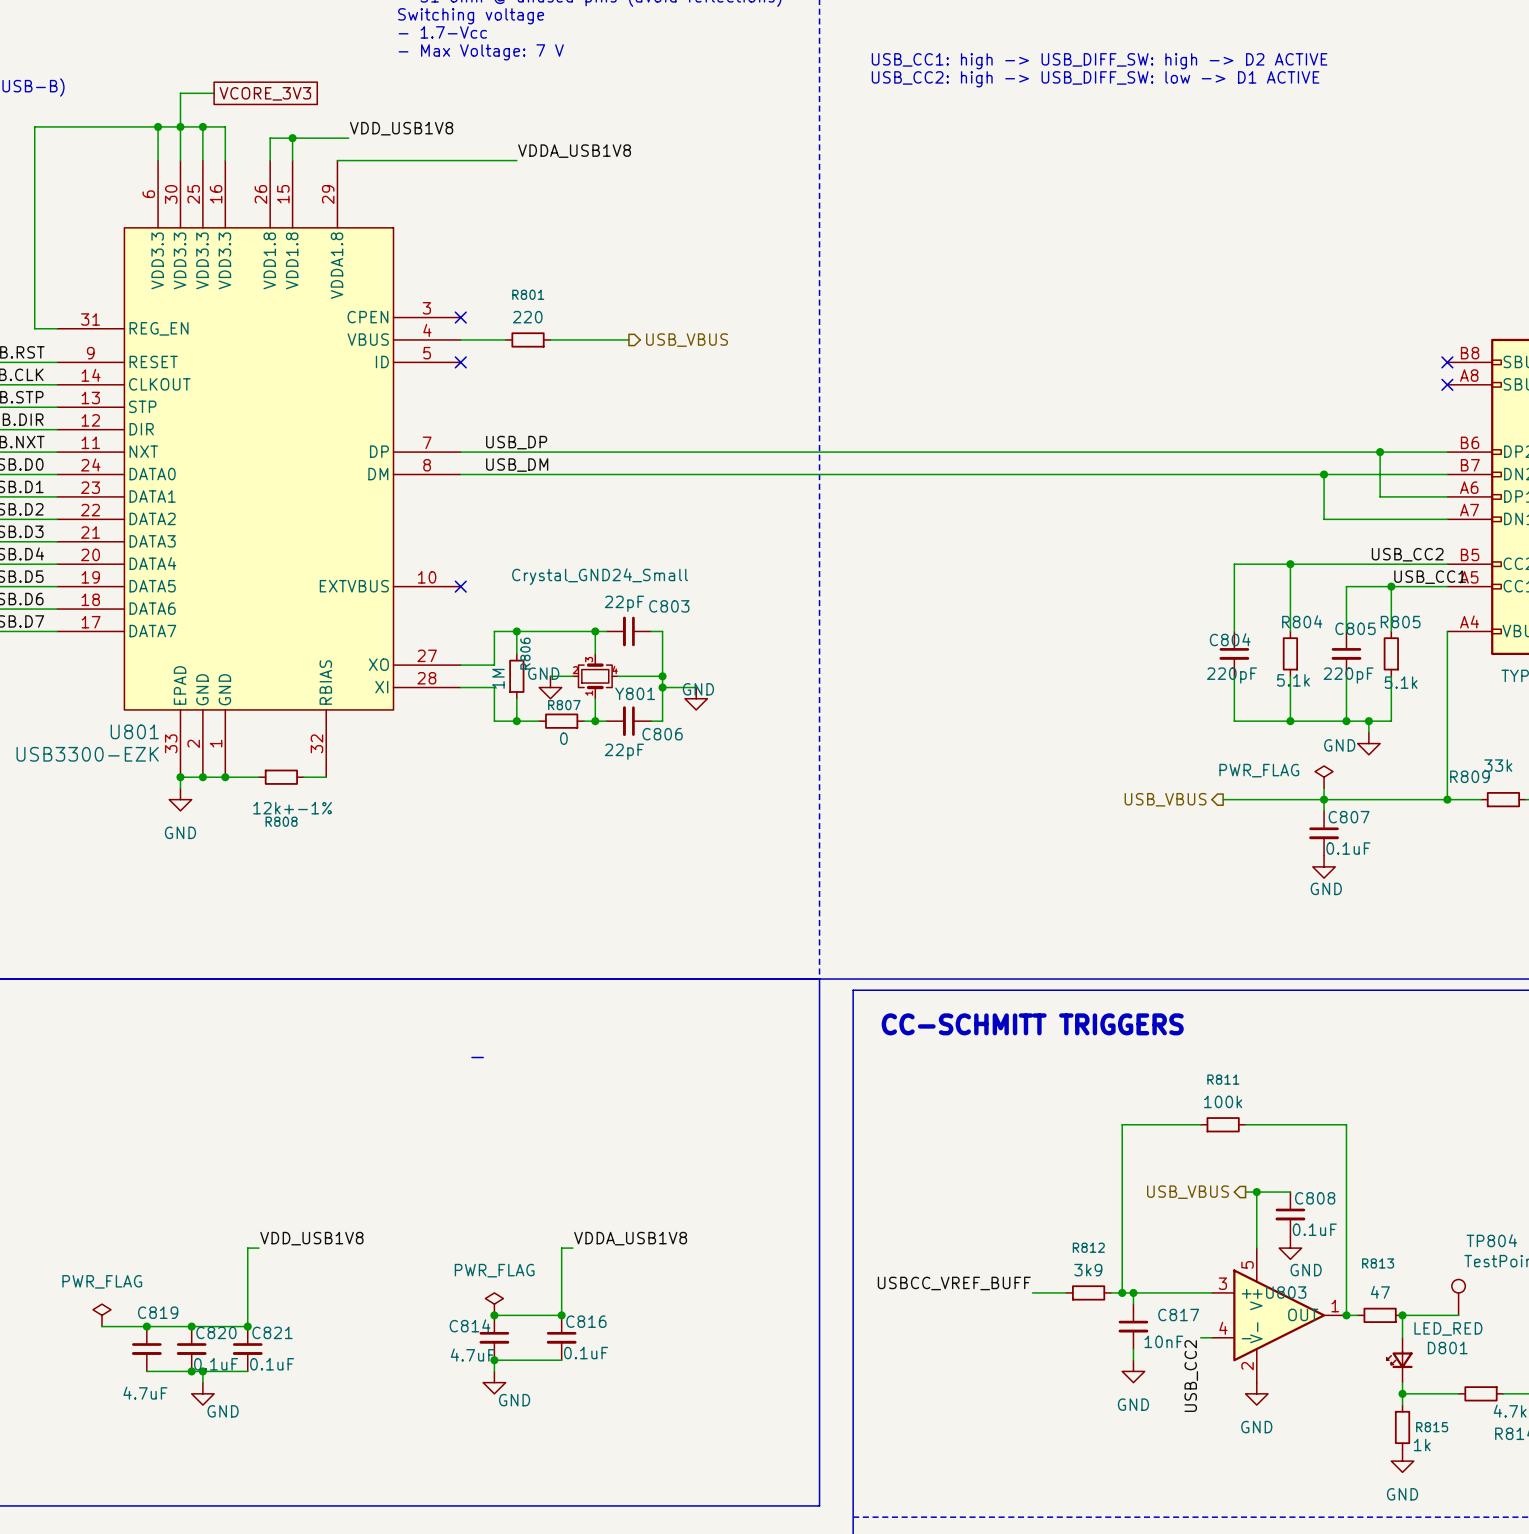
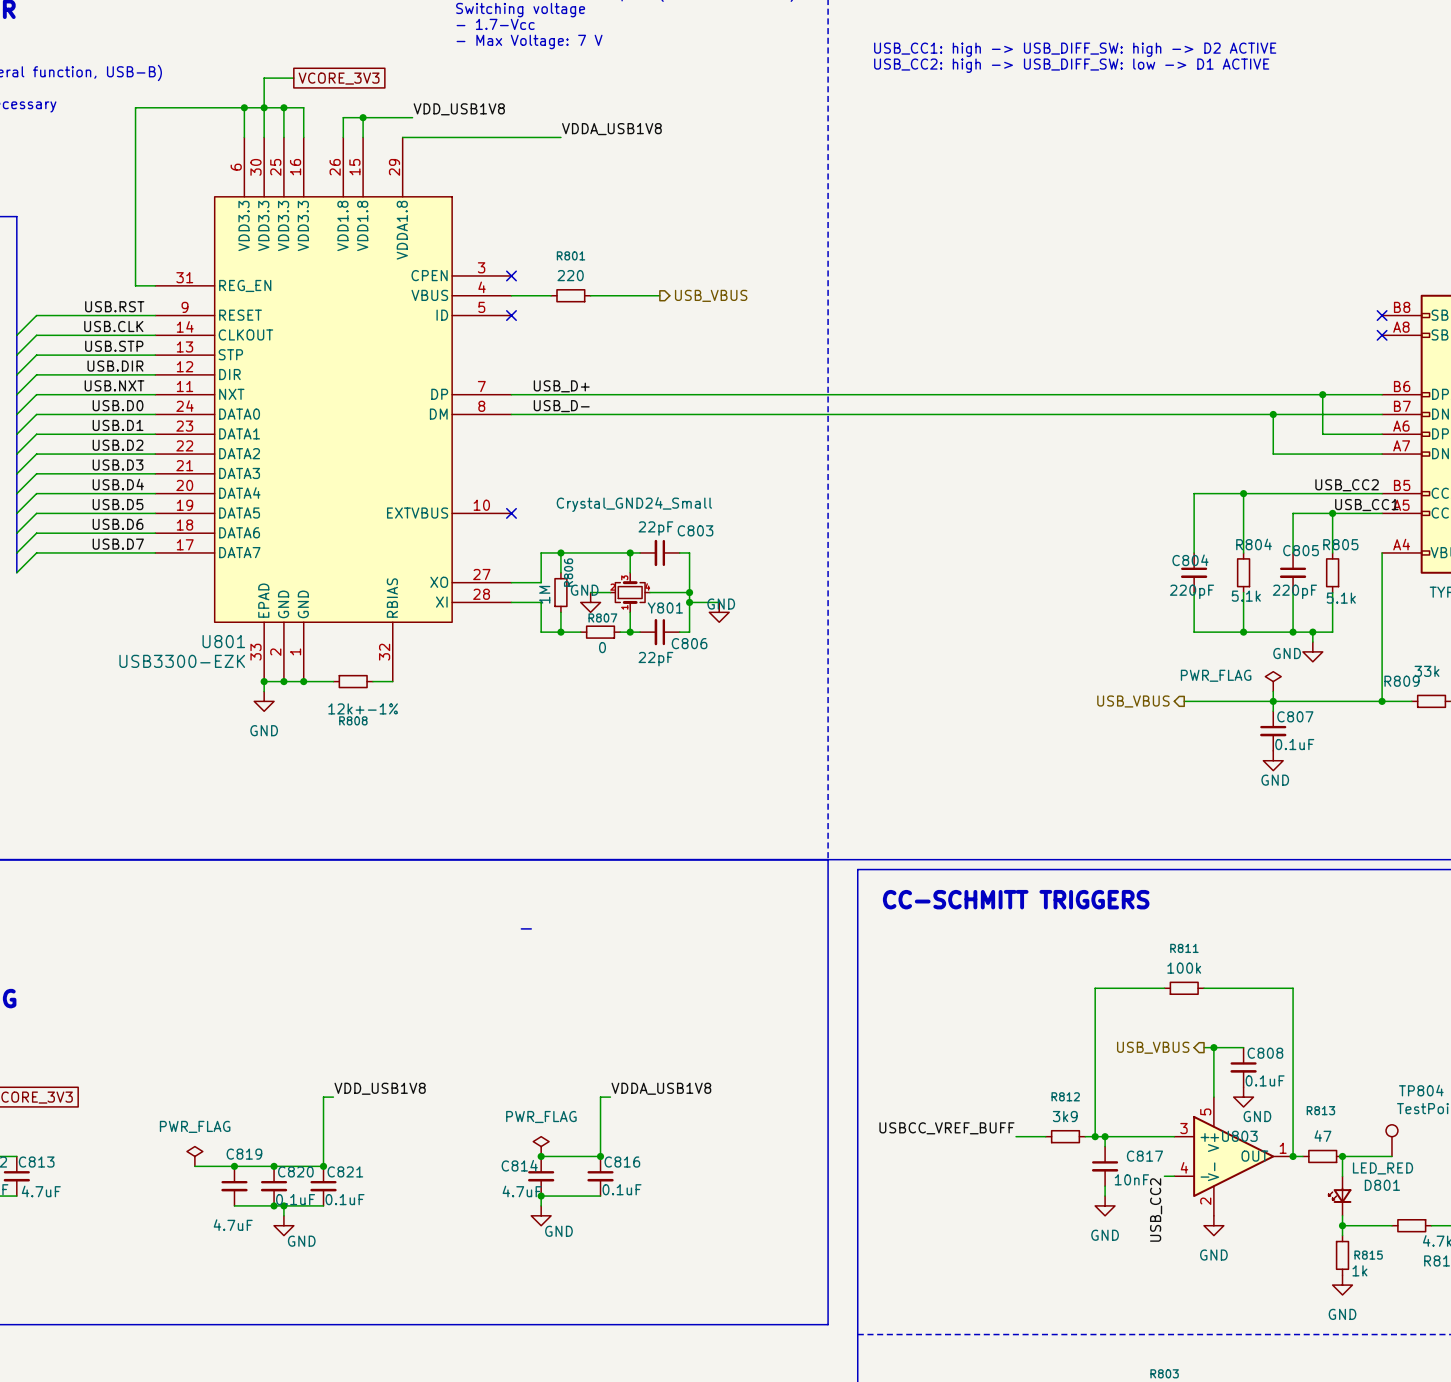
label: USB_DP (516, 442) -> USB_D+ (561, 386)
label: USB_DM (517, 465) -> USB_D- (561, 406)

